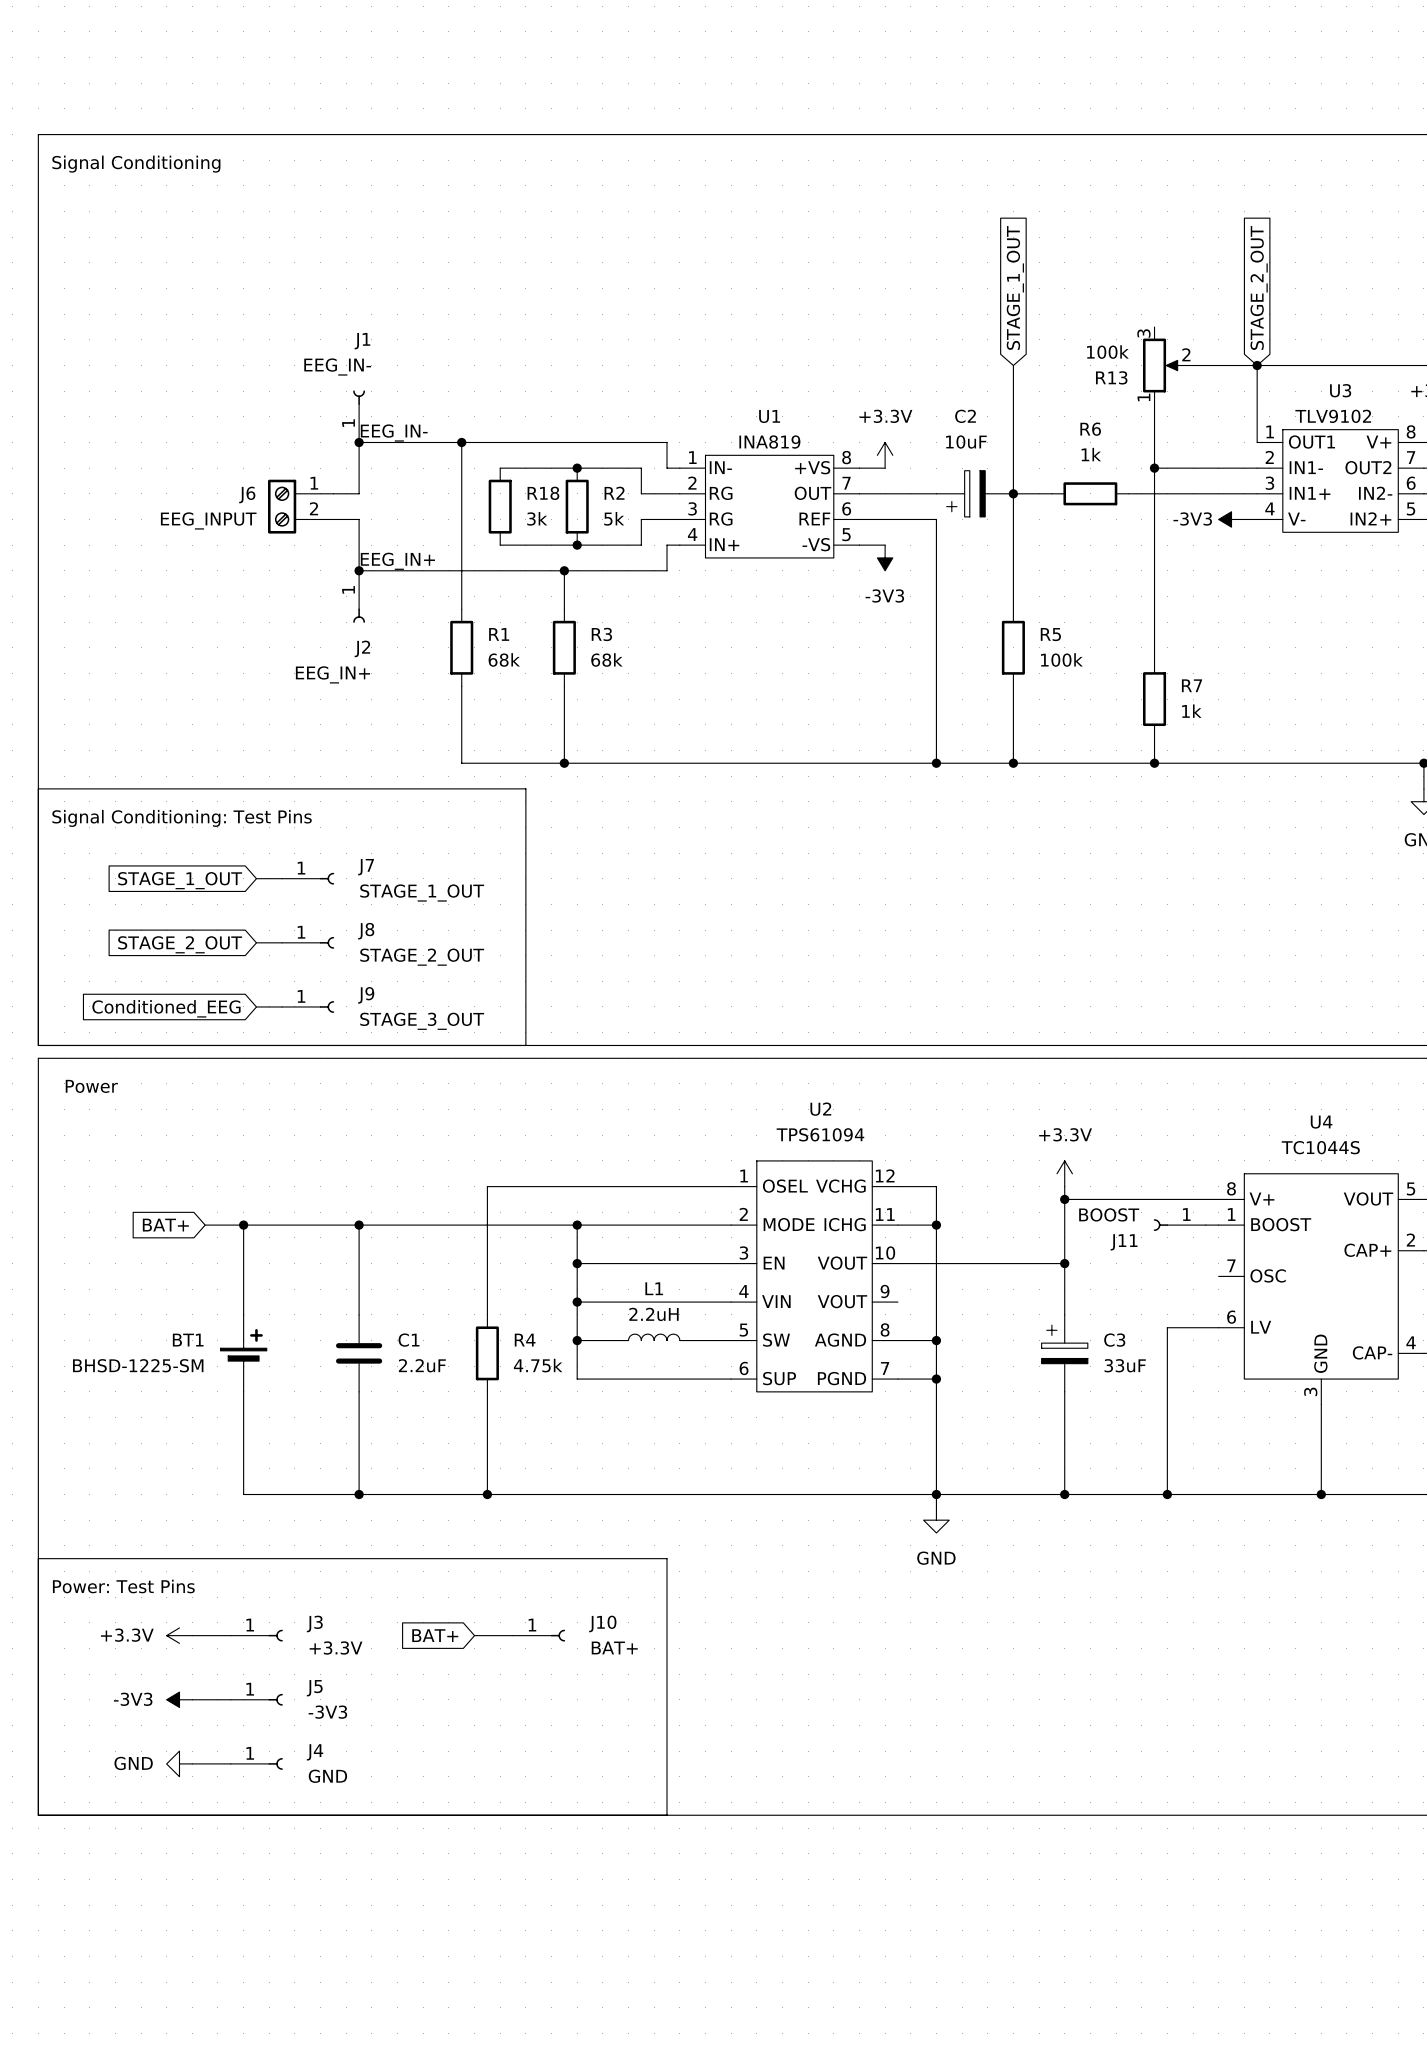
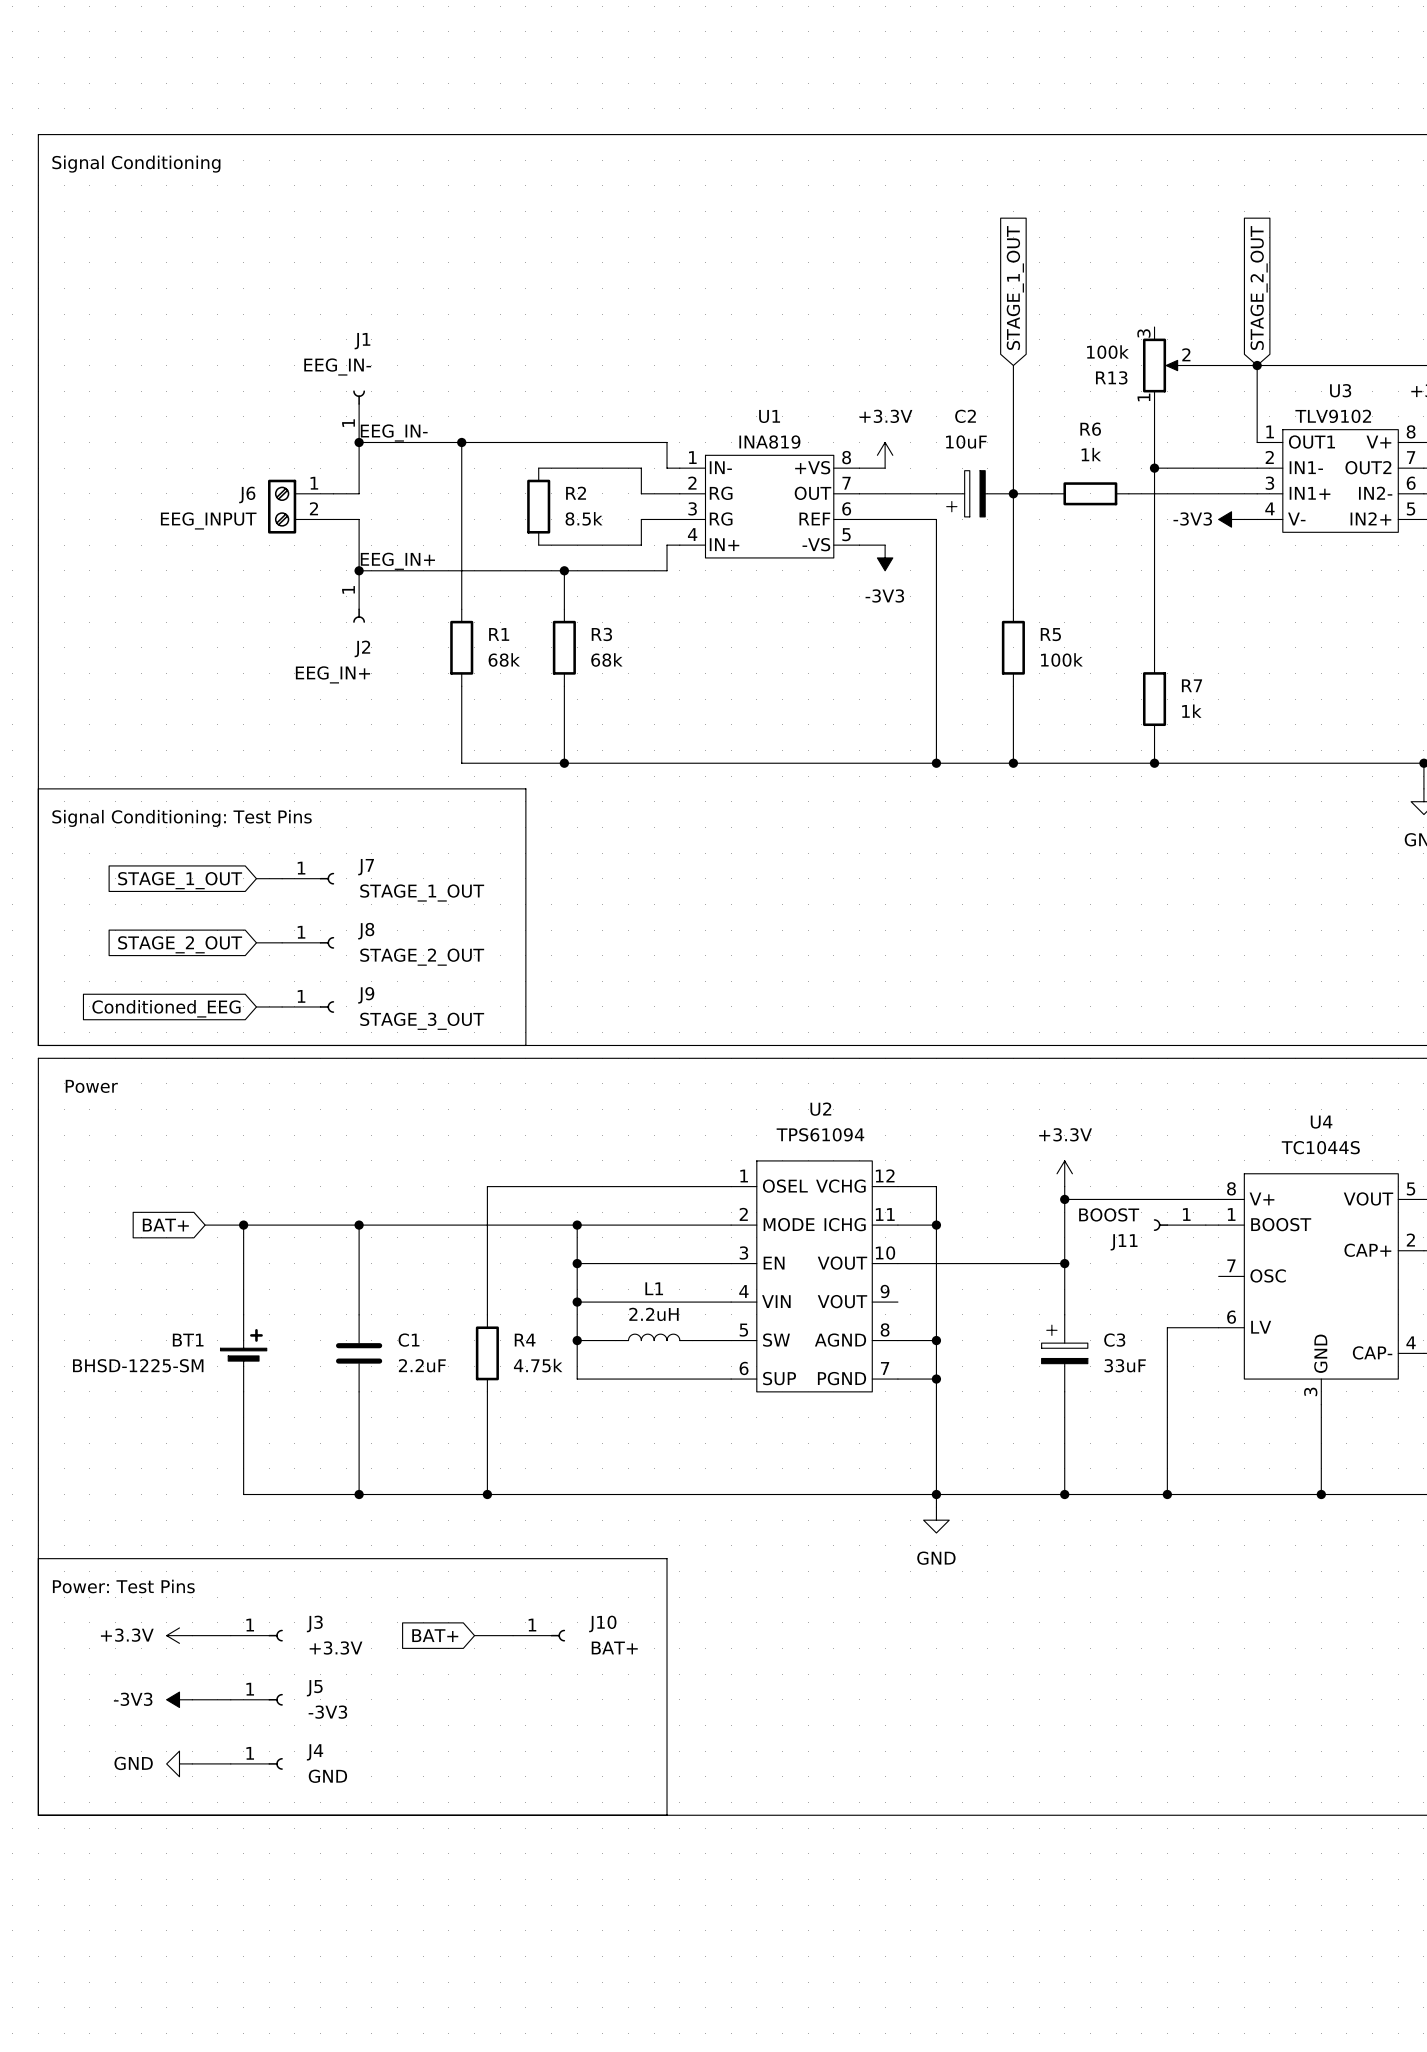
wire: (500, 468) (538, 468) -> none
junction: (577, 468) -> none
R18: 3k (500, 506) -> none
R2 position: (577, 506) -> (538, 506)
R2 value: 5k (614, 518) -> 8.5k (584, 518)
wire: (500, 545) (538, 545) -> none
junction: (577, 545) -> none

